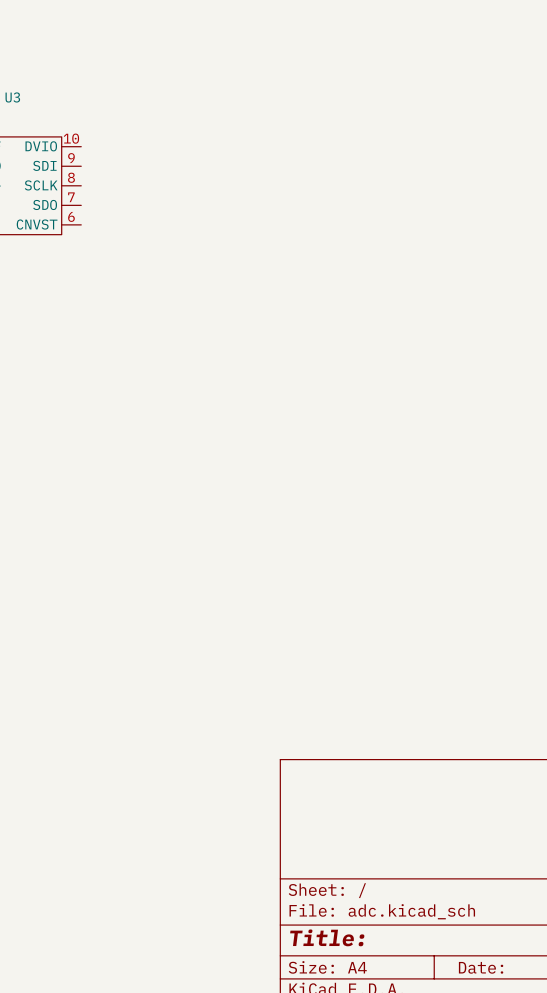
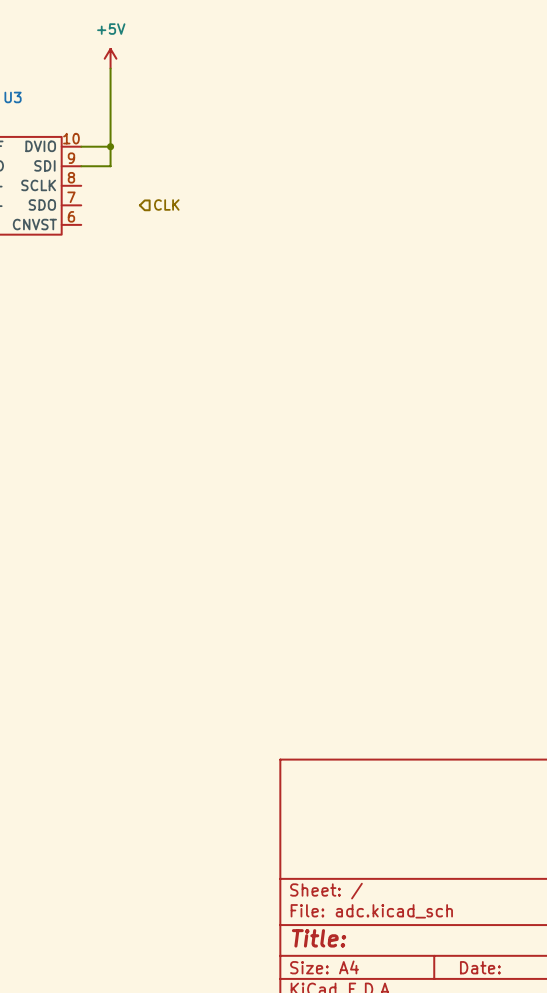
power symbol: none -> +5V (110, 58)
wire: none -> (110, 68) (110, 166) (81, 166)
wire: none -> (81, 146) (110, 146)
junction: none -> (110, 146)
hierarchical label: none -> CLK (166, 204)

